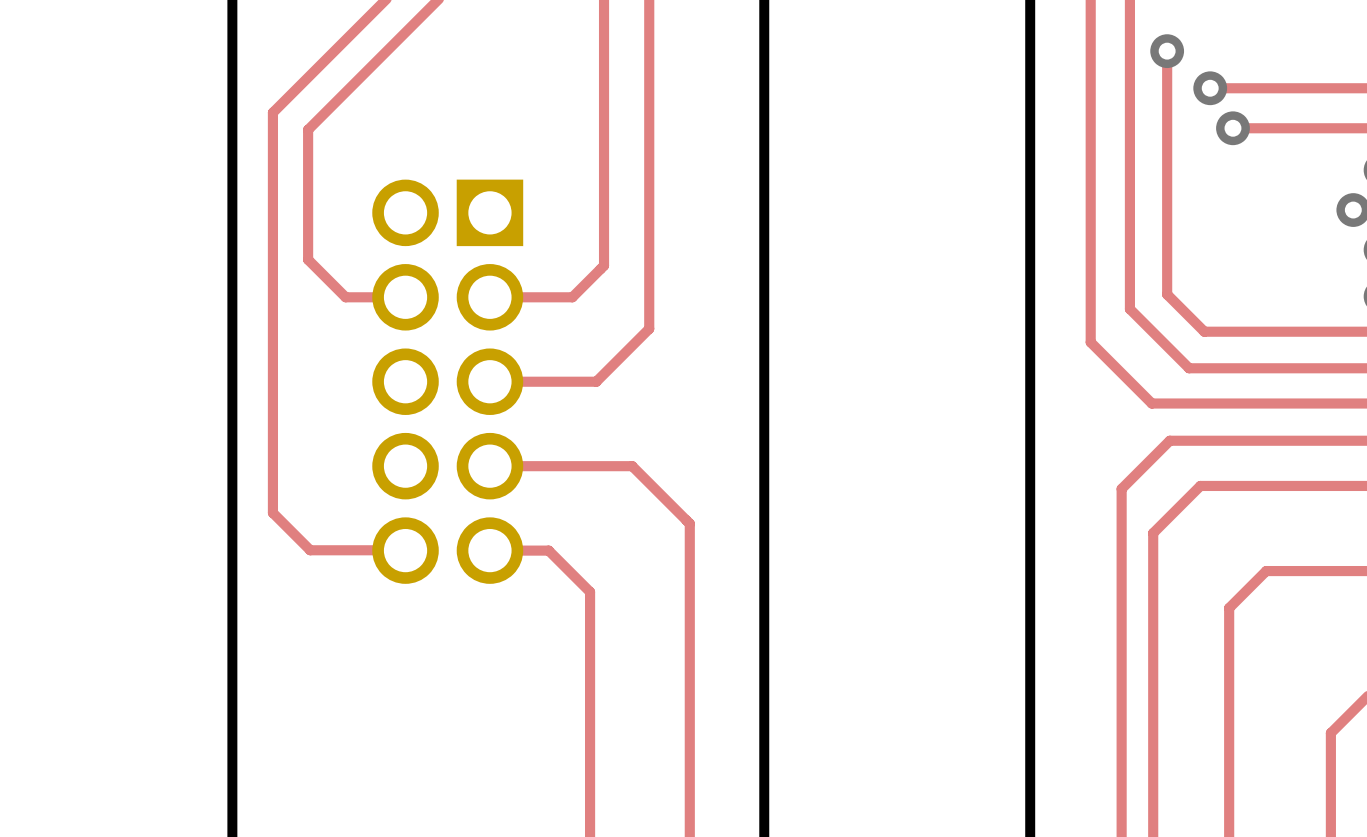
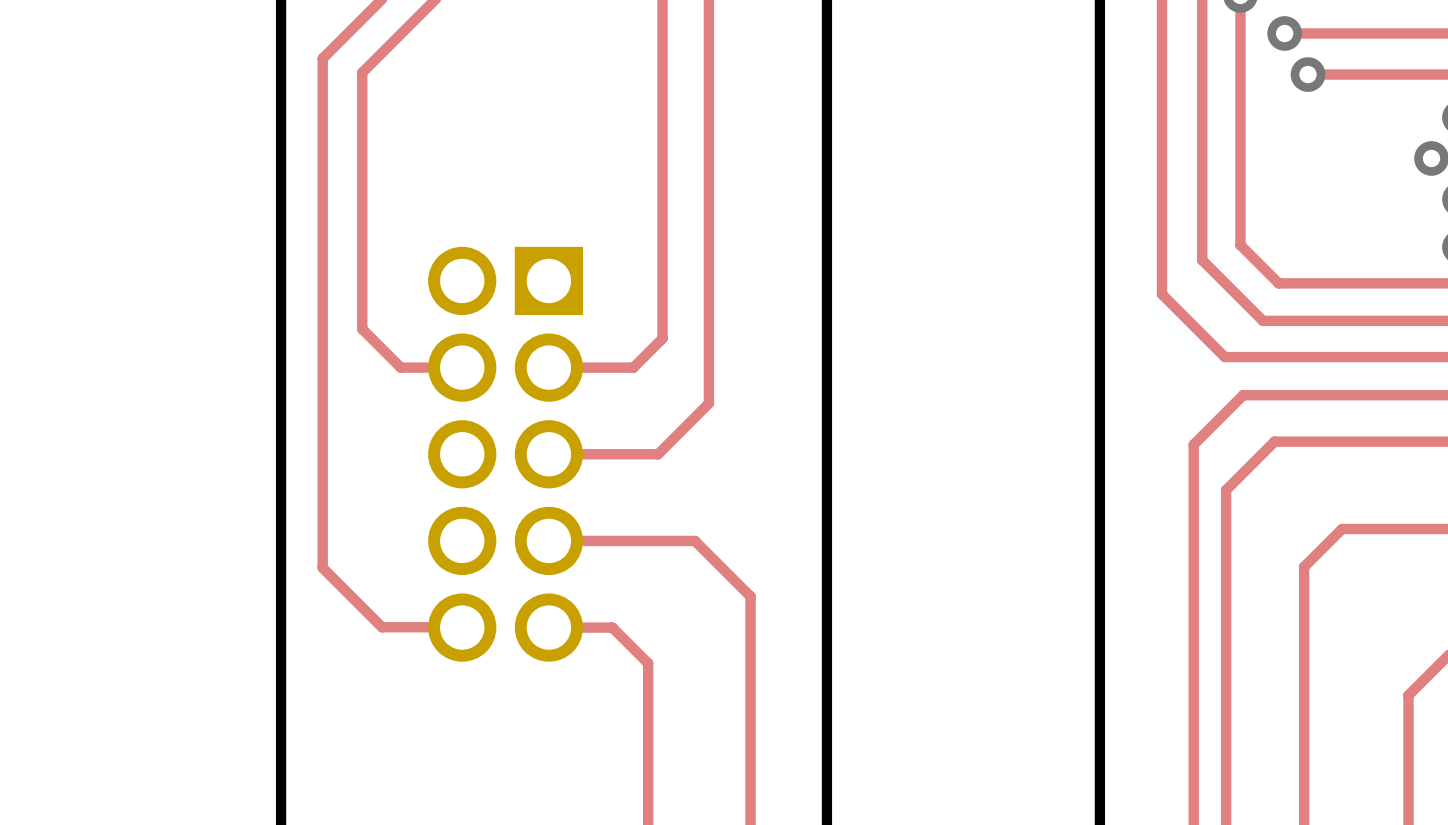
track: (311, 126) (308, 129) (308, 259) (345, 297) (405, 297) -> (362, 72) (362, 329) (400, 367) (462, 367)
track: (604, 265) (572, 297) (489, 297) -> (662, 215) (662, 338) (633, 367) (548, 367)
track: (649, 328) (596, 381) (489, 381) -> (708, 280) (708, 403) (658, 454) (548, 454)
part position: (447, 381) -> (505, 454)
track: (489, 466) (632, 466) (689, 523) (689, 636) -> (548, 540) (694, 540) (750, 596)
track: (272, 512) (310, 550) (405, 550) -> (322, 469) (322, 567) (382, 627) (461, 627)
track: (489, 550) (548, 550) (590, 591) (590, 702) -> (548, 627) (612, 627) (648, 663)

